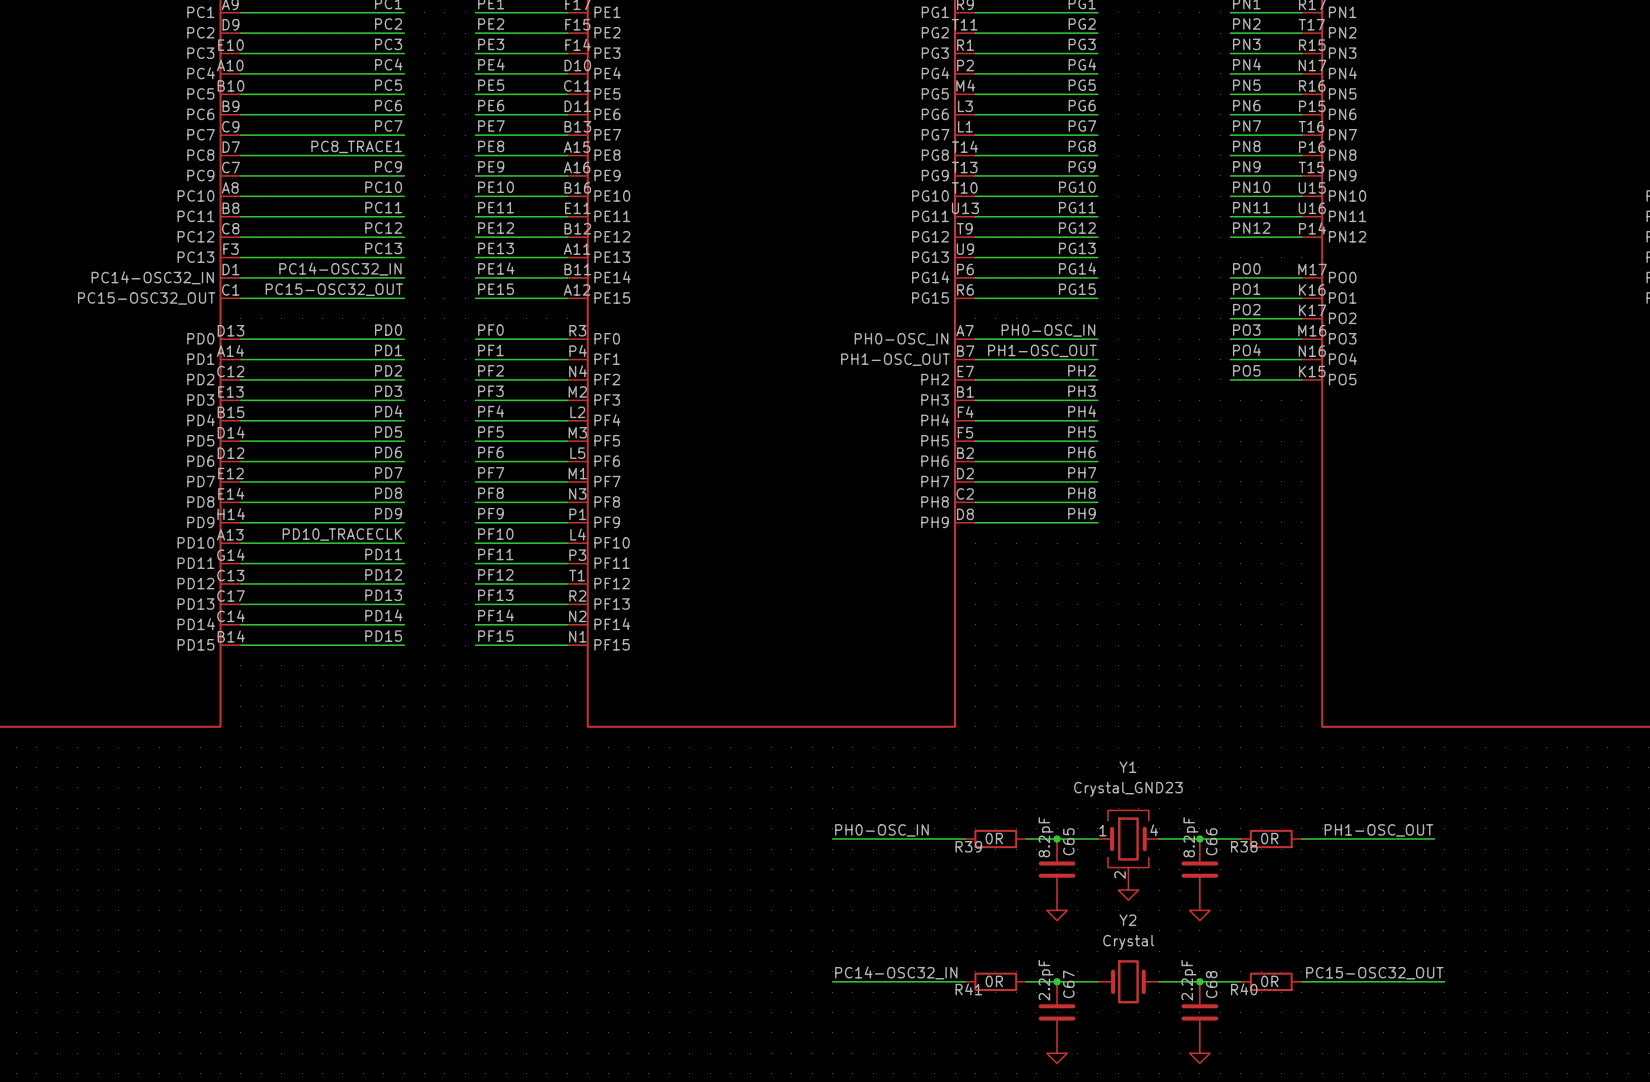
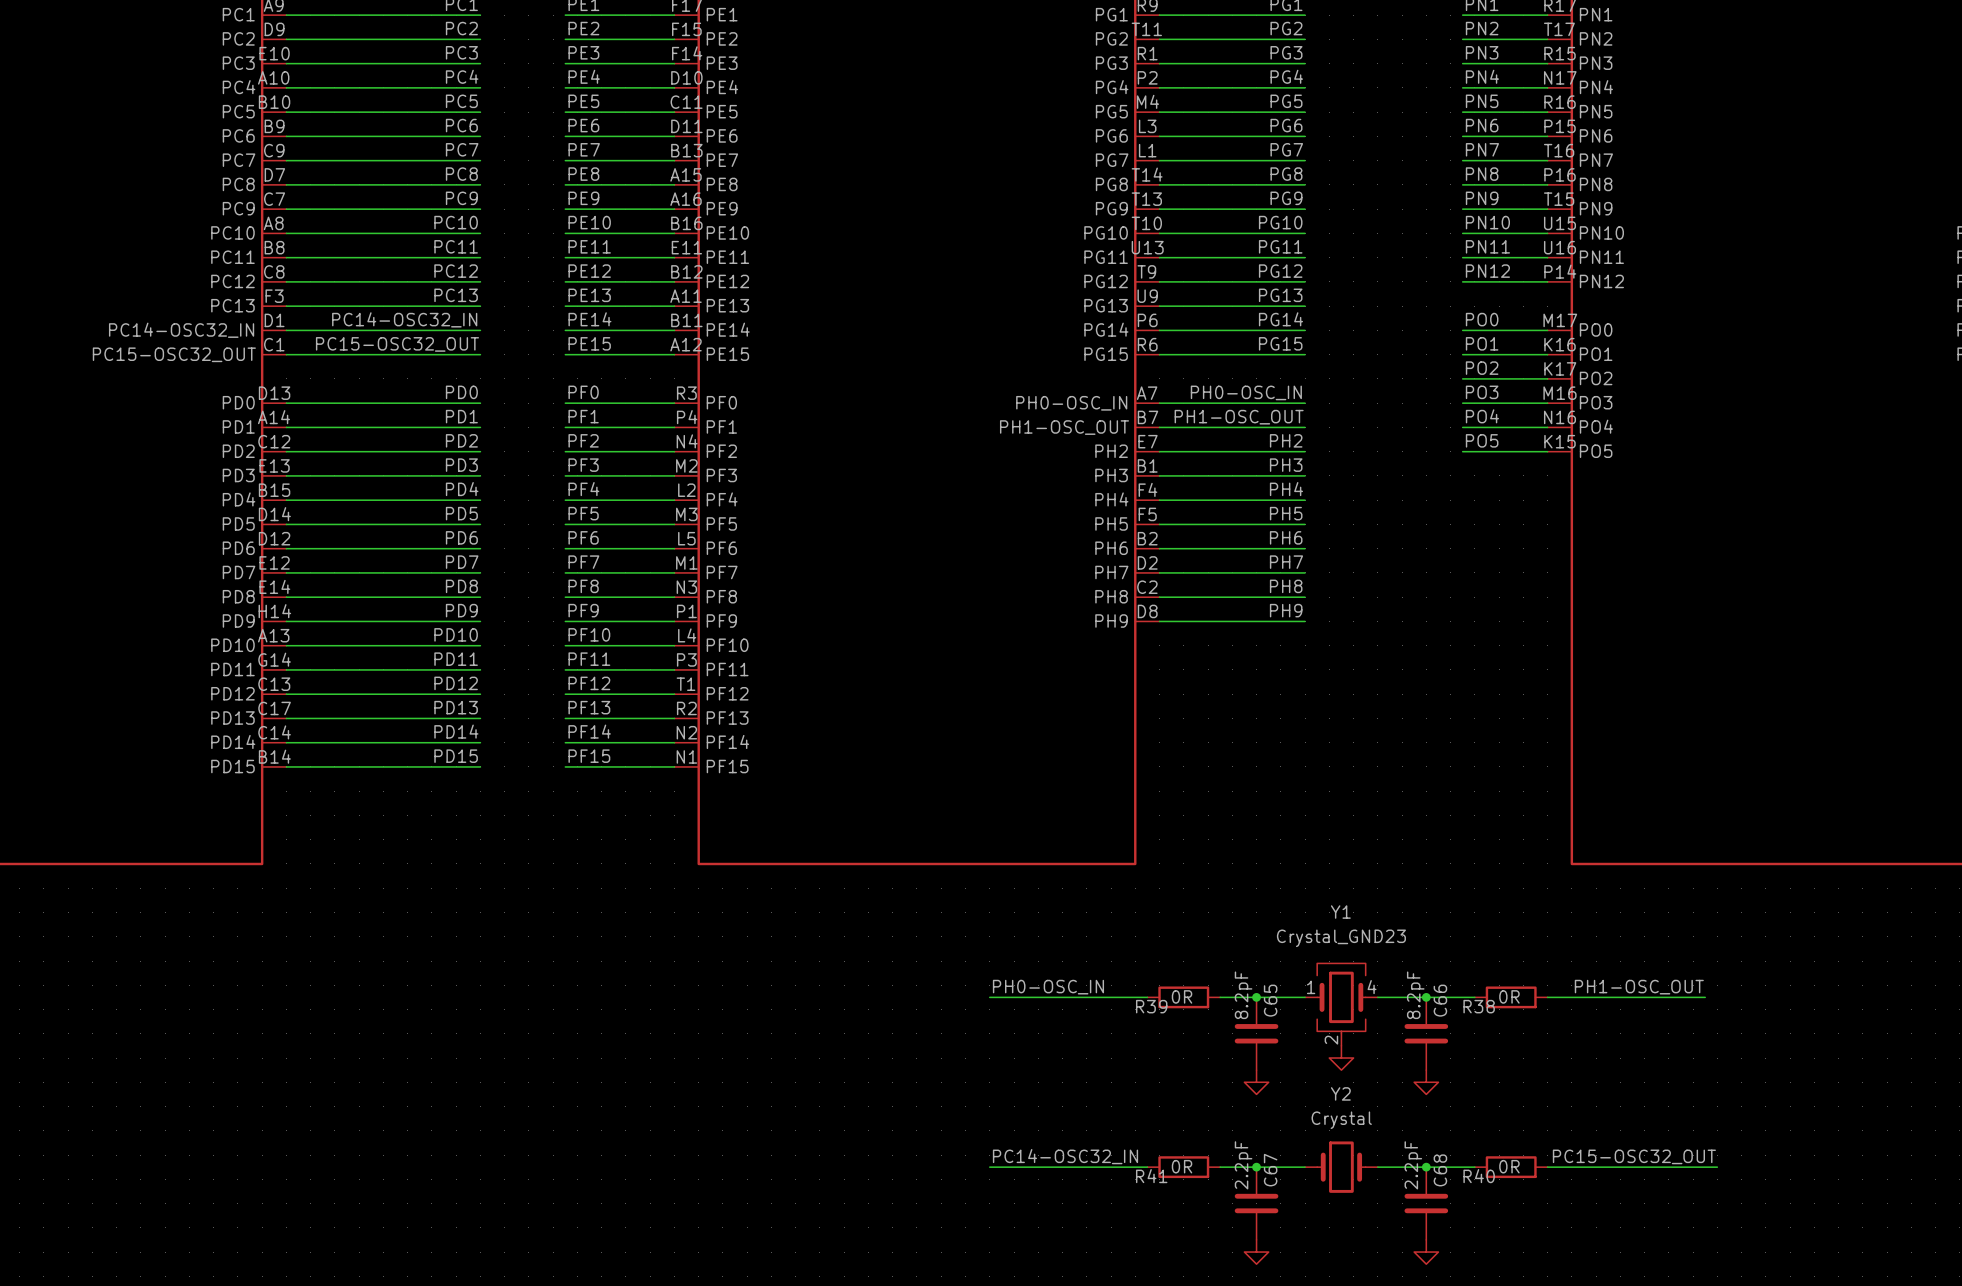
label: PC8_TRACE1 (356, 146) -> PC8 (461, 174)
label: PD10_TRACECLK (342, 534) -> PD10 (456, 634)

